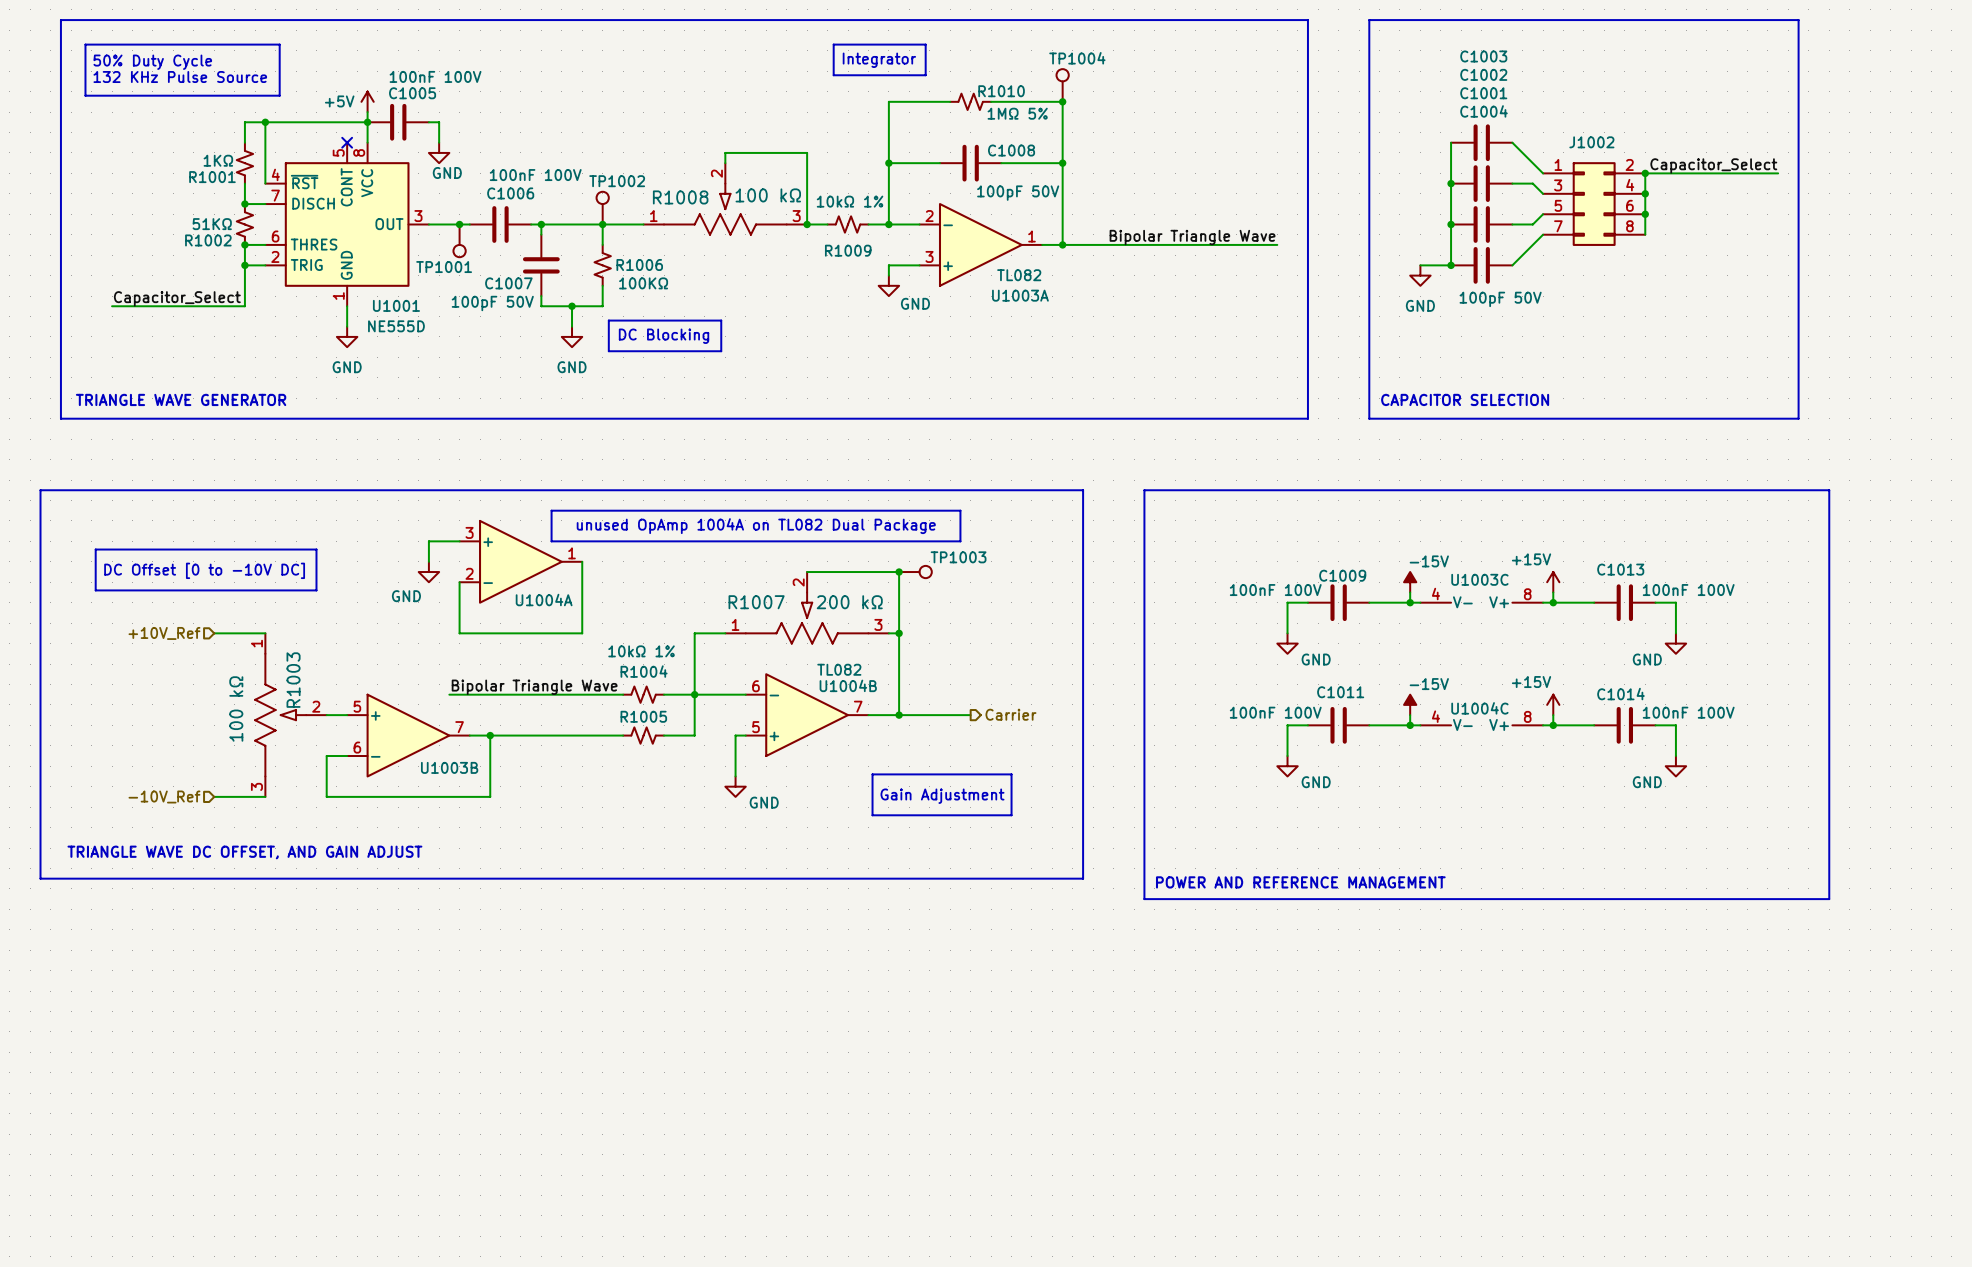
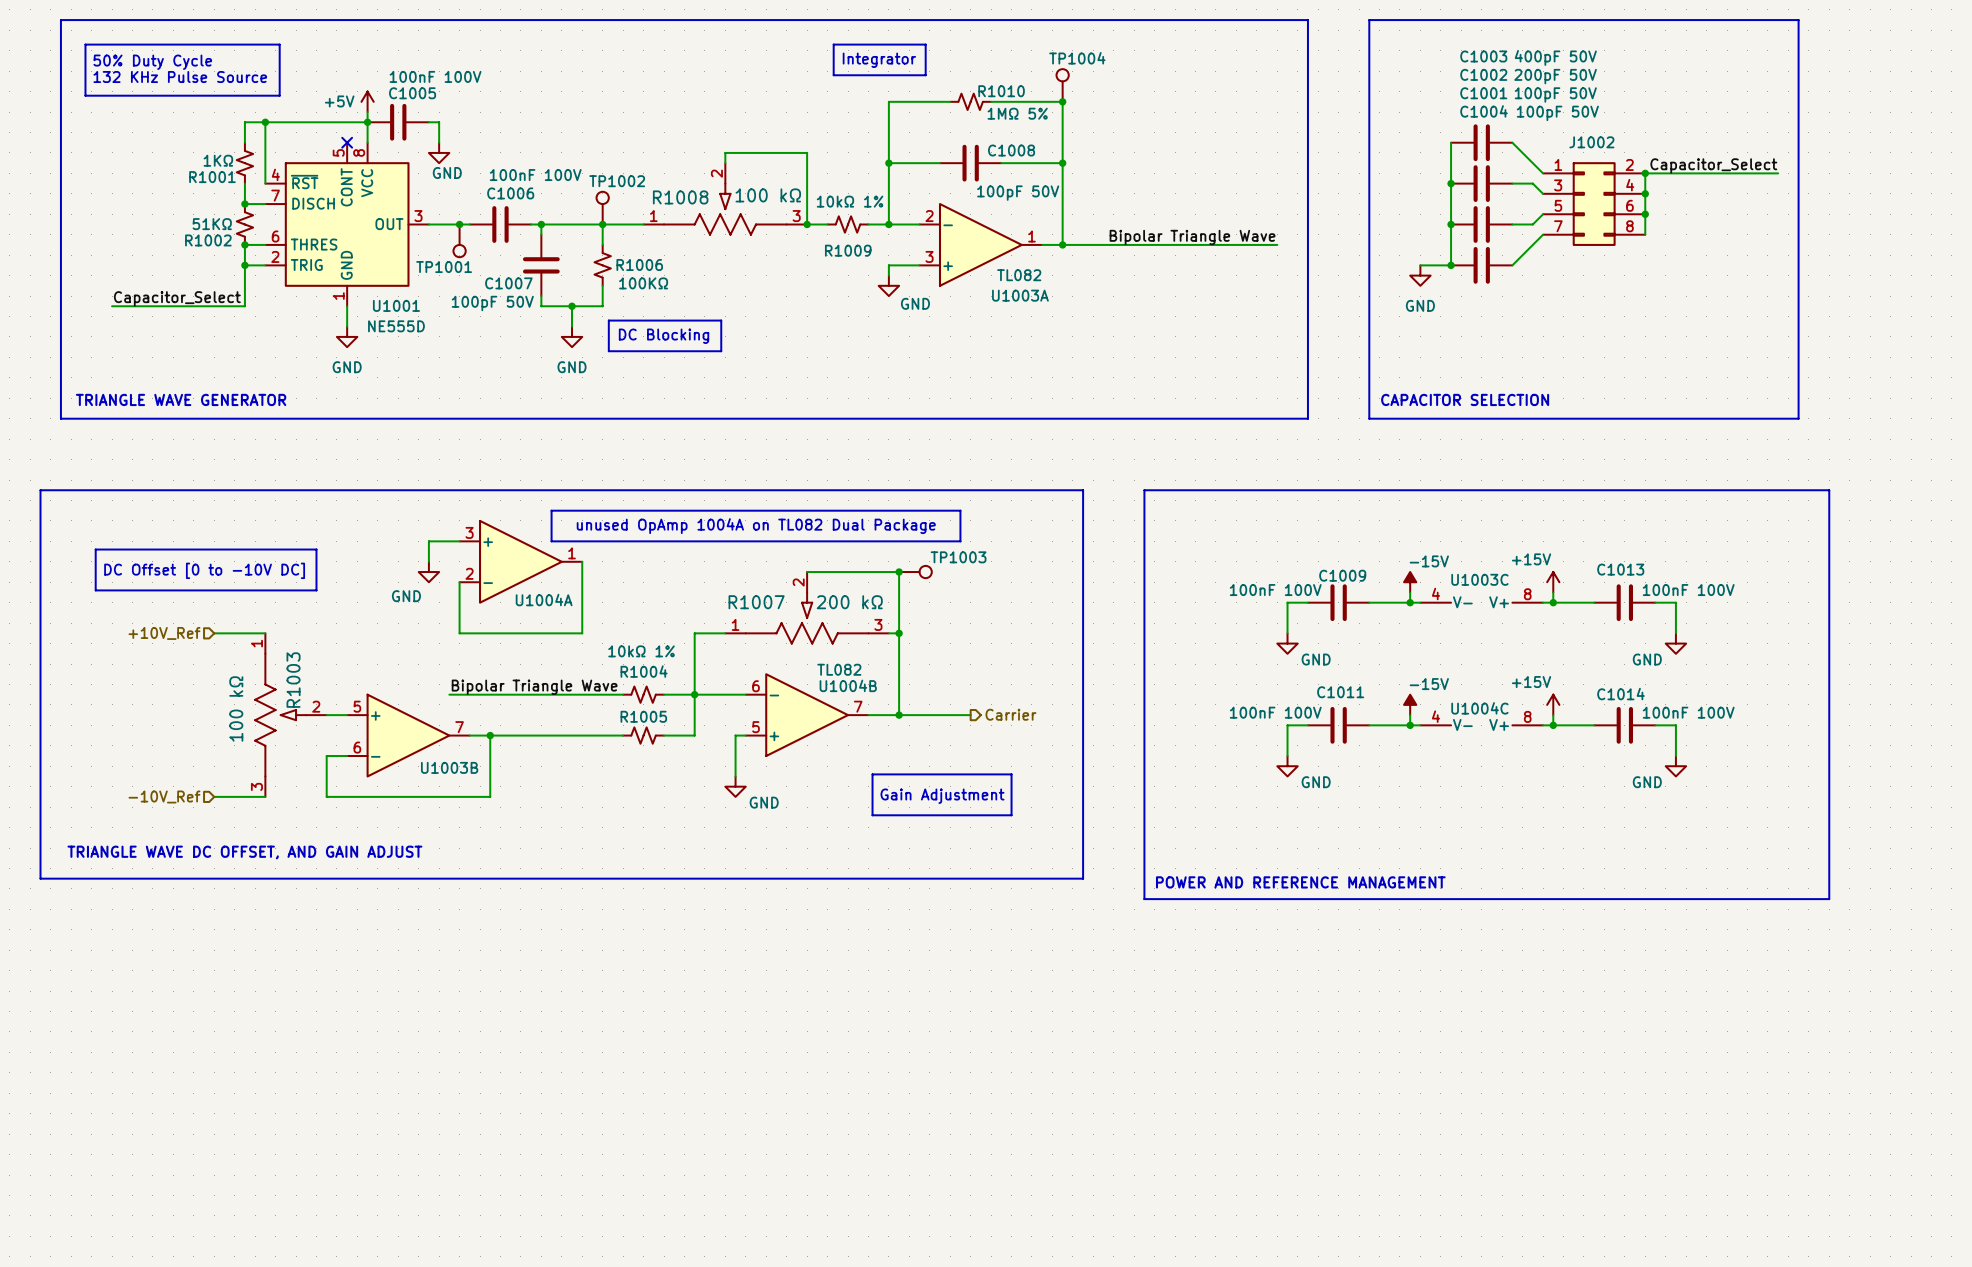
C1003 value: none -> 400pF 50V (1555, 57)
C1002 value: none -> 200pF 50V (1555, 76)
C1001 value: none -> 100pF 50V (1555, 94)
C1004 value position: 100pF 50V (1500, 299) -> 100pF 50V (1557, 113)

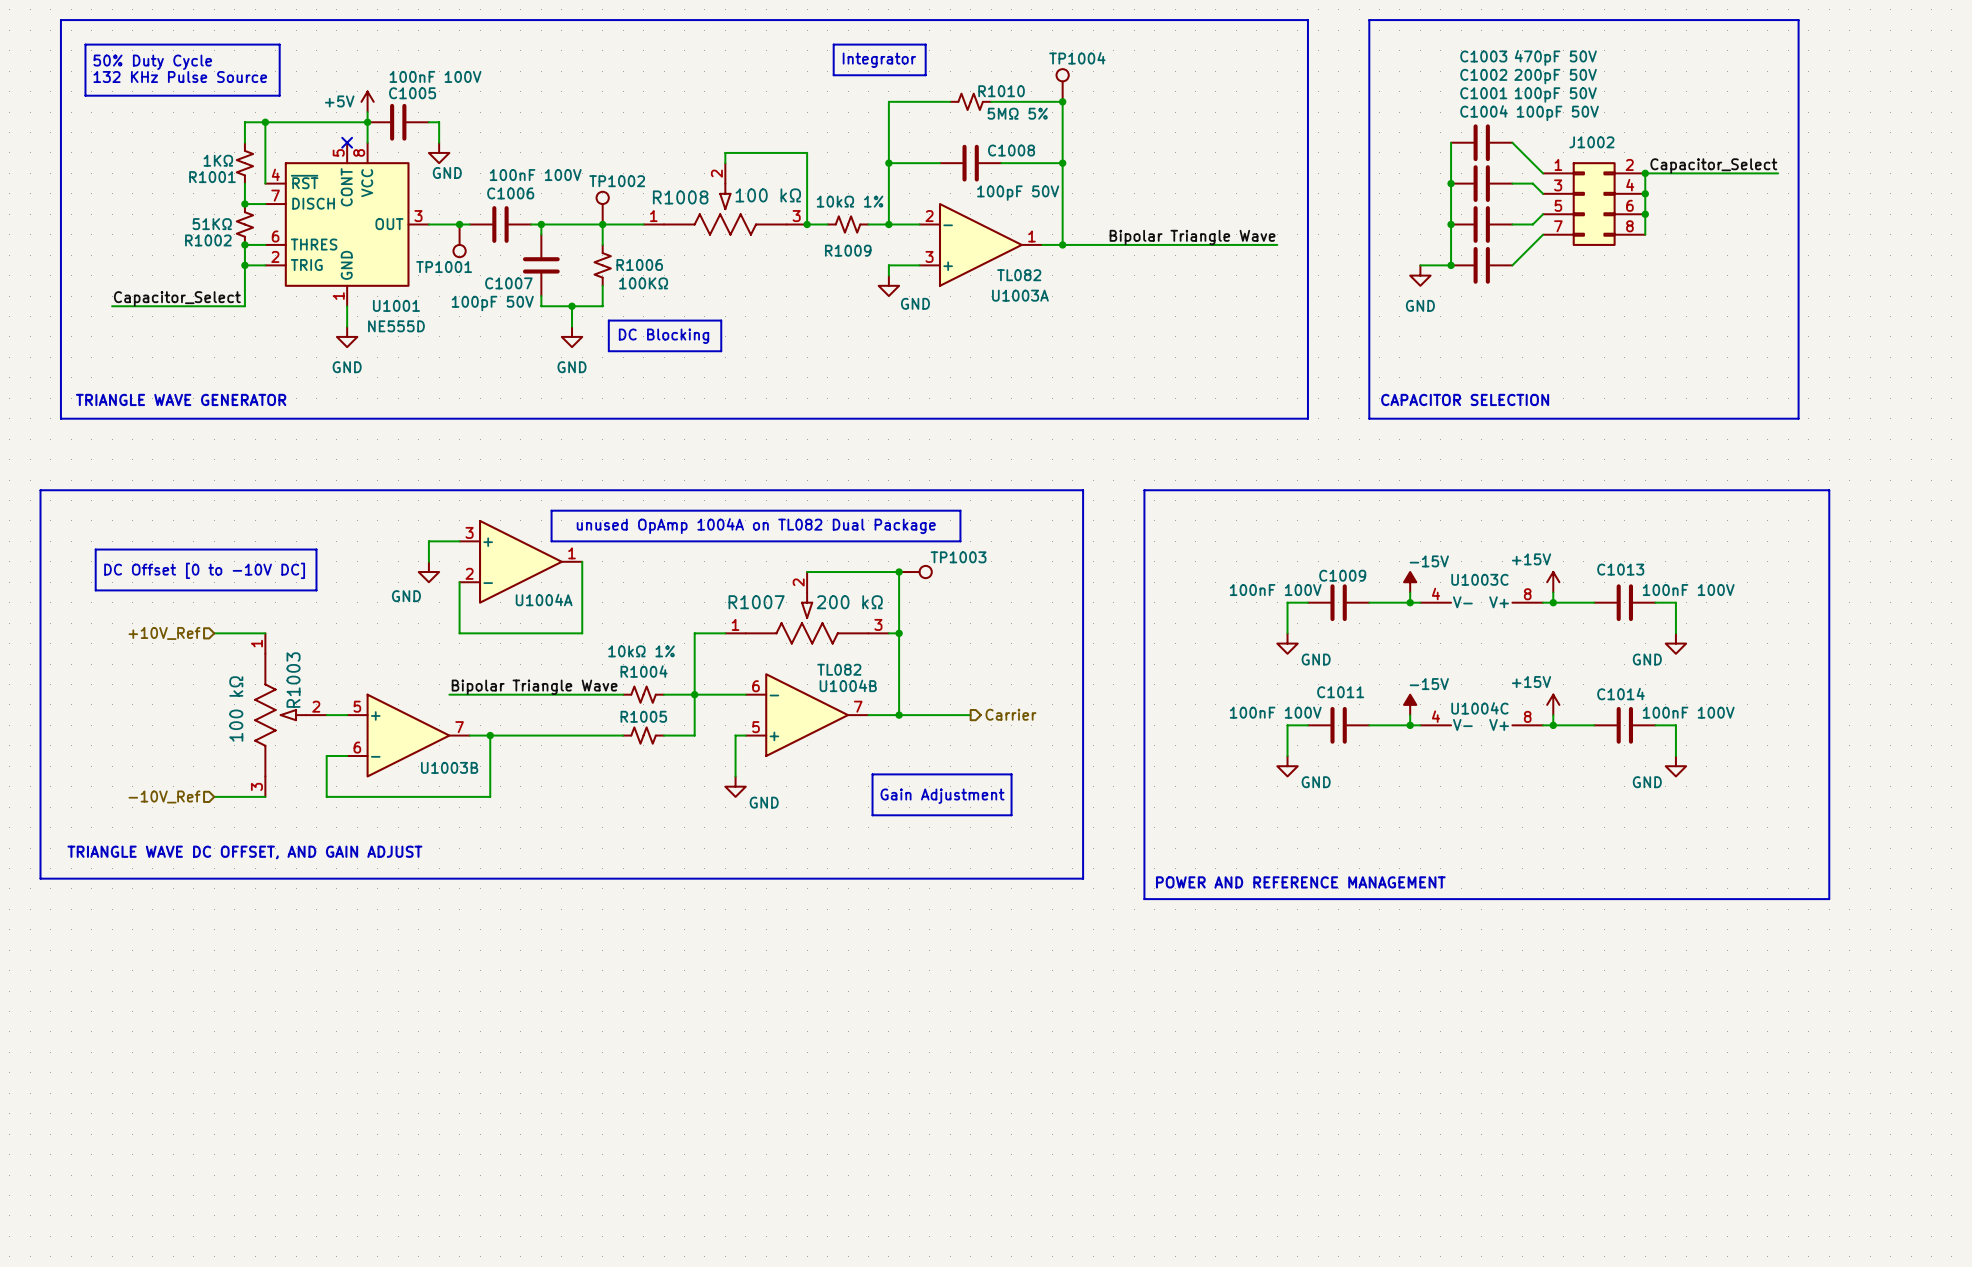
C1003 value: 400pF 50V (1555, 57) -> 470pF 50V (1555, 57)
R1010 value: 1MΩ 5% (1017, 113) -> 5MΩ 5% (1017, 113)

